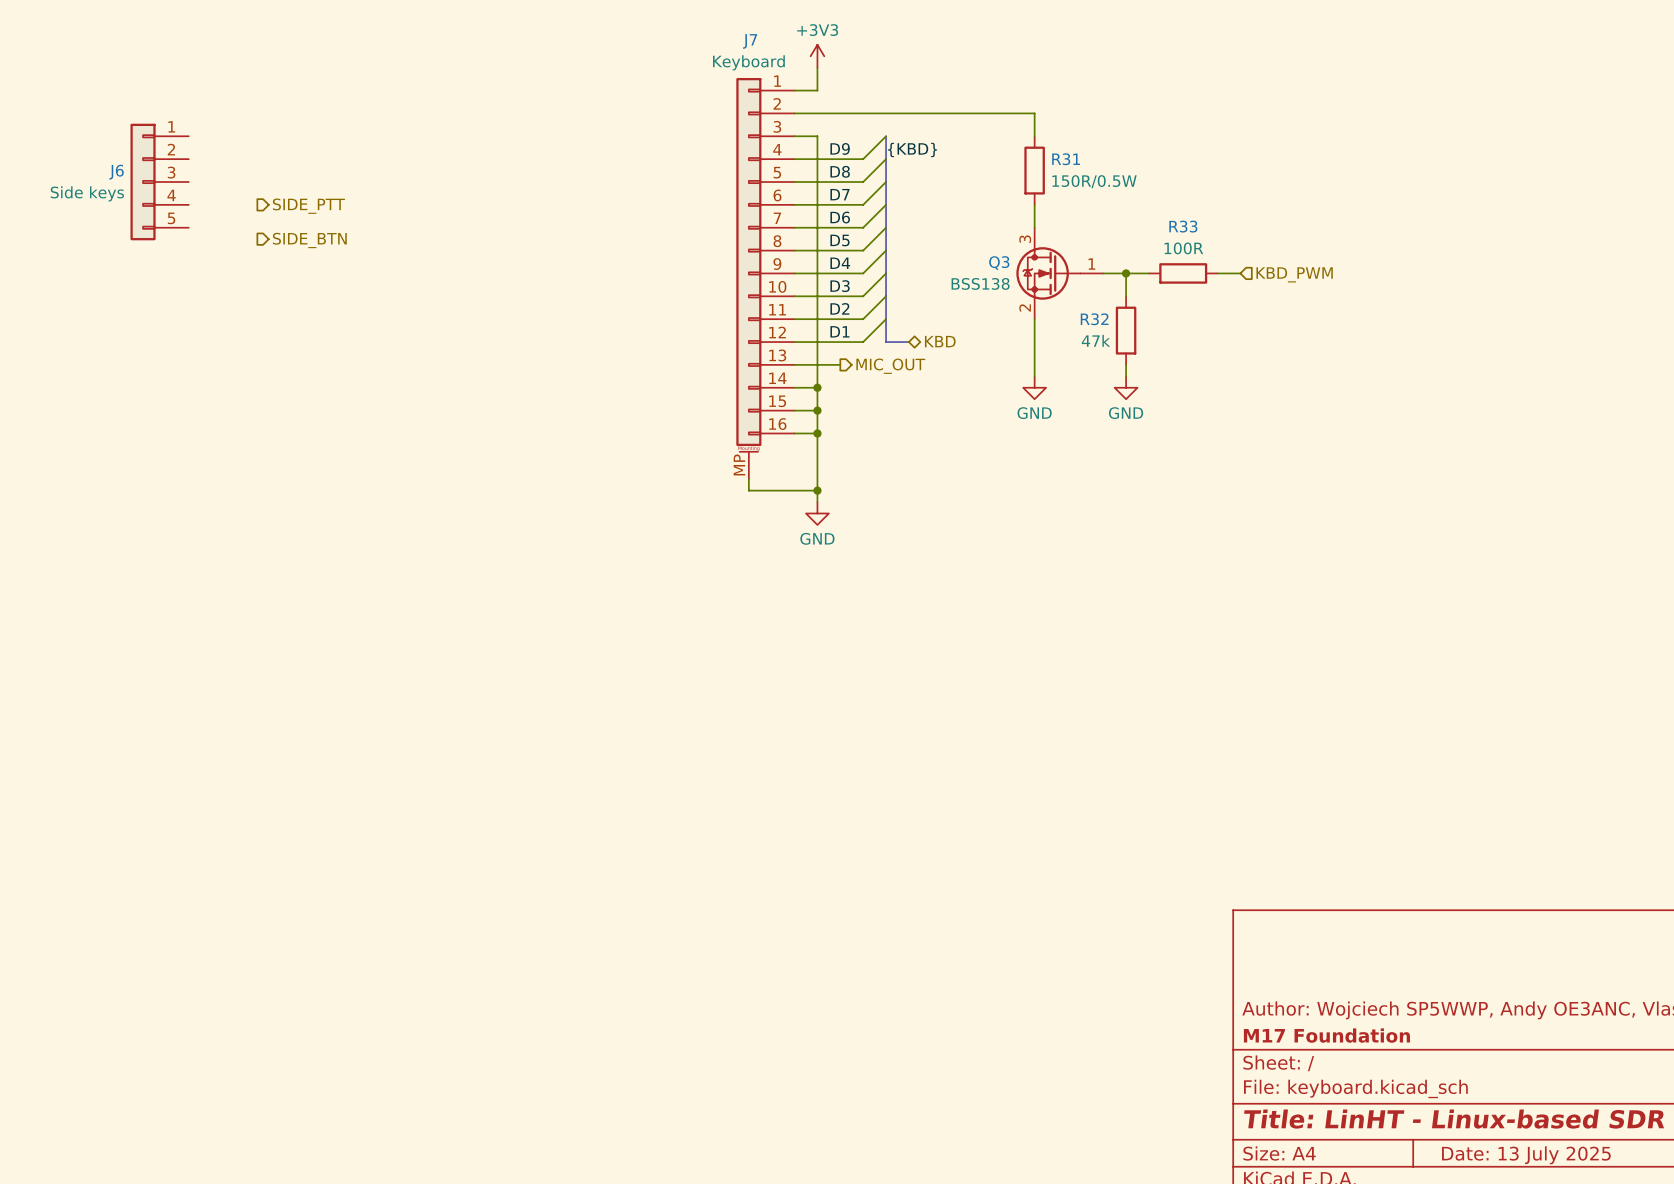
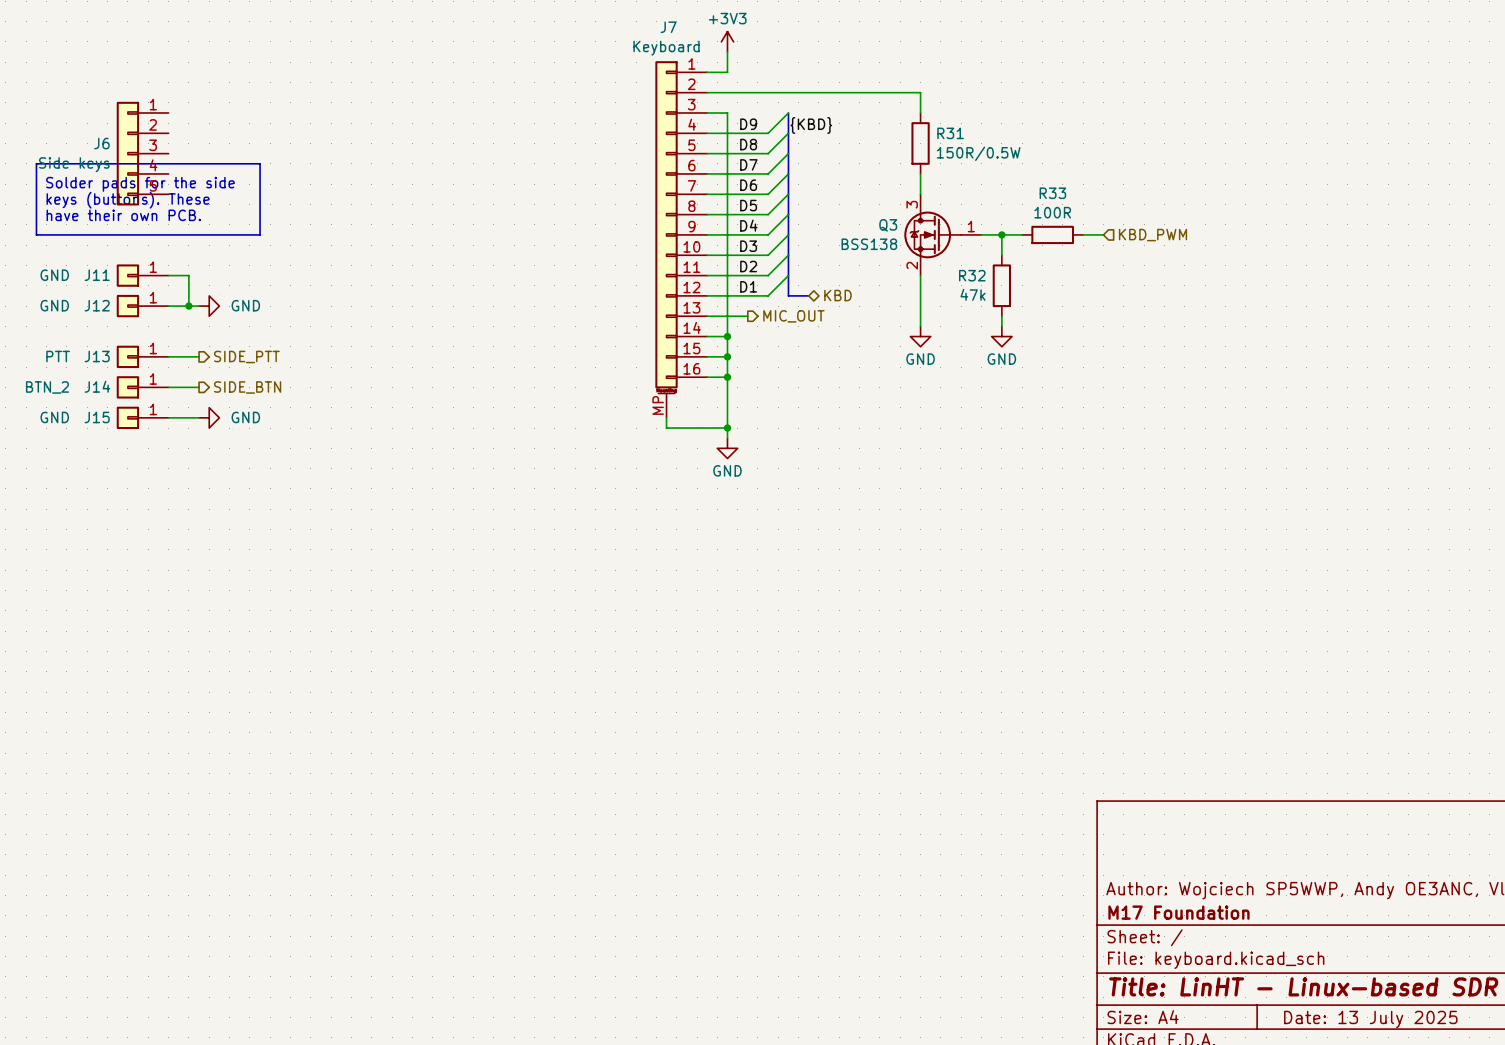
line: none -> (36, 163) (260, 163) (260, 234) (36, 234) (36, 163)
hierarchical label position: SIDE_PTT (308, 206) -> SIDE_PTT (246, 356)
text: none -> Solder pads for the side (140, 184)
text: none -> keys (buttons). These (128, 200)
hierarchical label position: SIDE_BTN (309, 240) -> SIDE_BTN (247, 387)
text: none -> have their own PCB. (123, 215)
J11: none -> GND (142, 275)
wire: none -> (168, 275) (188, 275) (188, 306)
J12: none -> GND (142, 306)
wire: none -> (168, 306) (199, 306)
junction: none -> (188, 306)
power symbol: none -> GND (209, 306)
J13: none -> PTT (142, 356)
wire: none -> (168, 356) (199, 356)
J14: none -> BTN_2 (142, 387)
wire: none -> (168, 387) (199, 387)
J15: none -> GND (142, 417)
wire: none -> (168, 417) (199, 417)
power symbol: none -> GND (209, 417)

